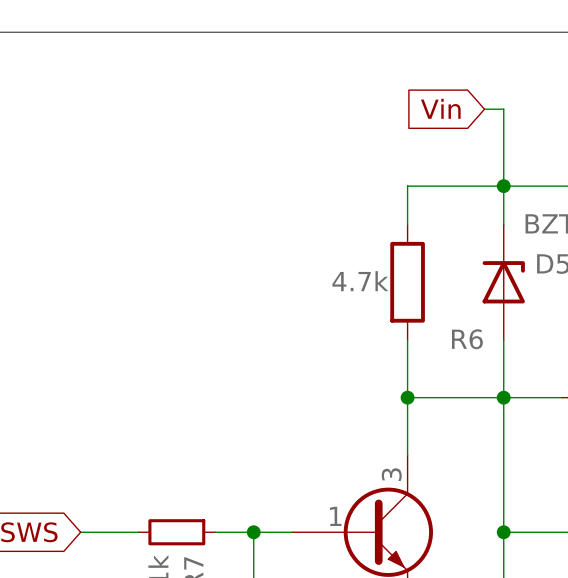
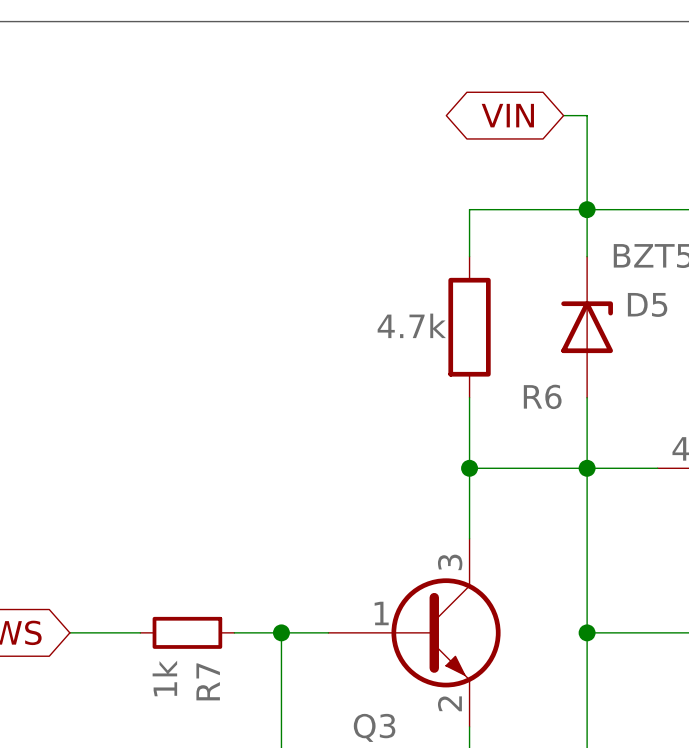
global label shape: input (440, 108) -> bidirectional (507, 115)
global label: Vin (440, 108) -> VIN (507, 115)

